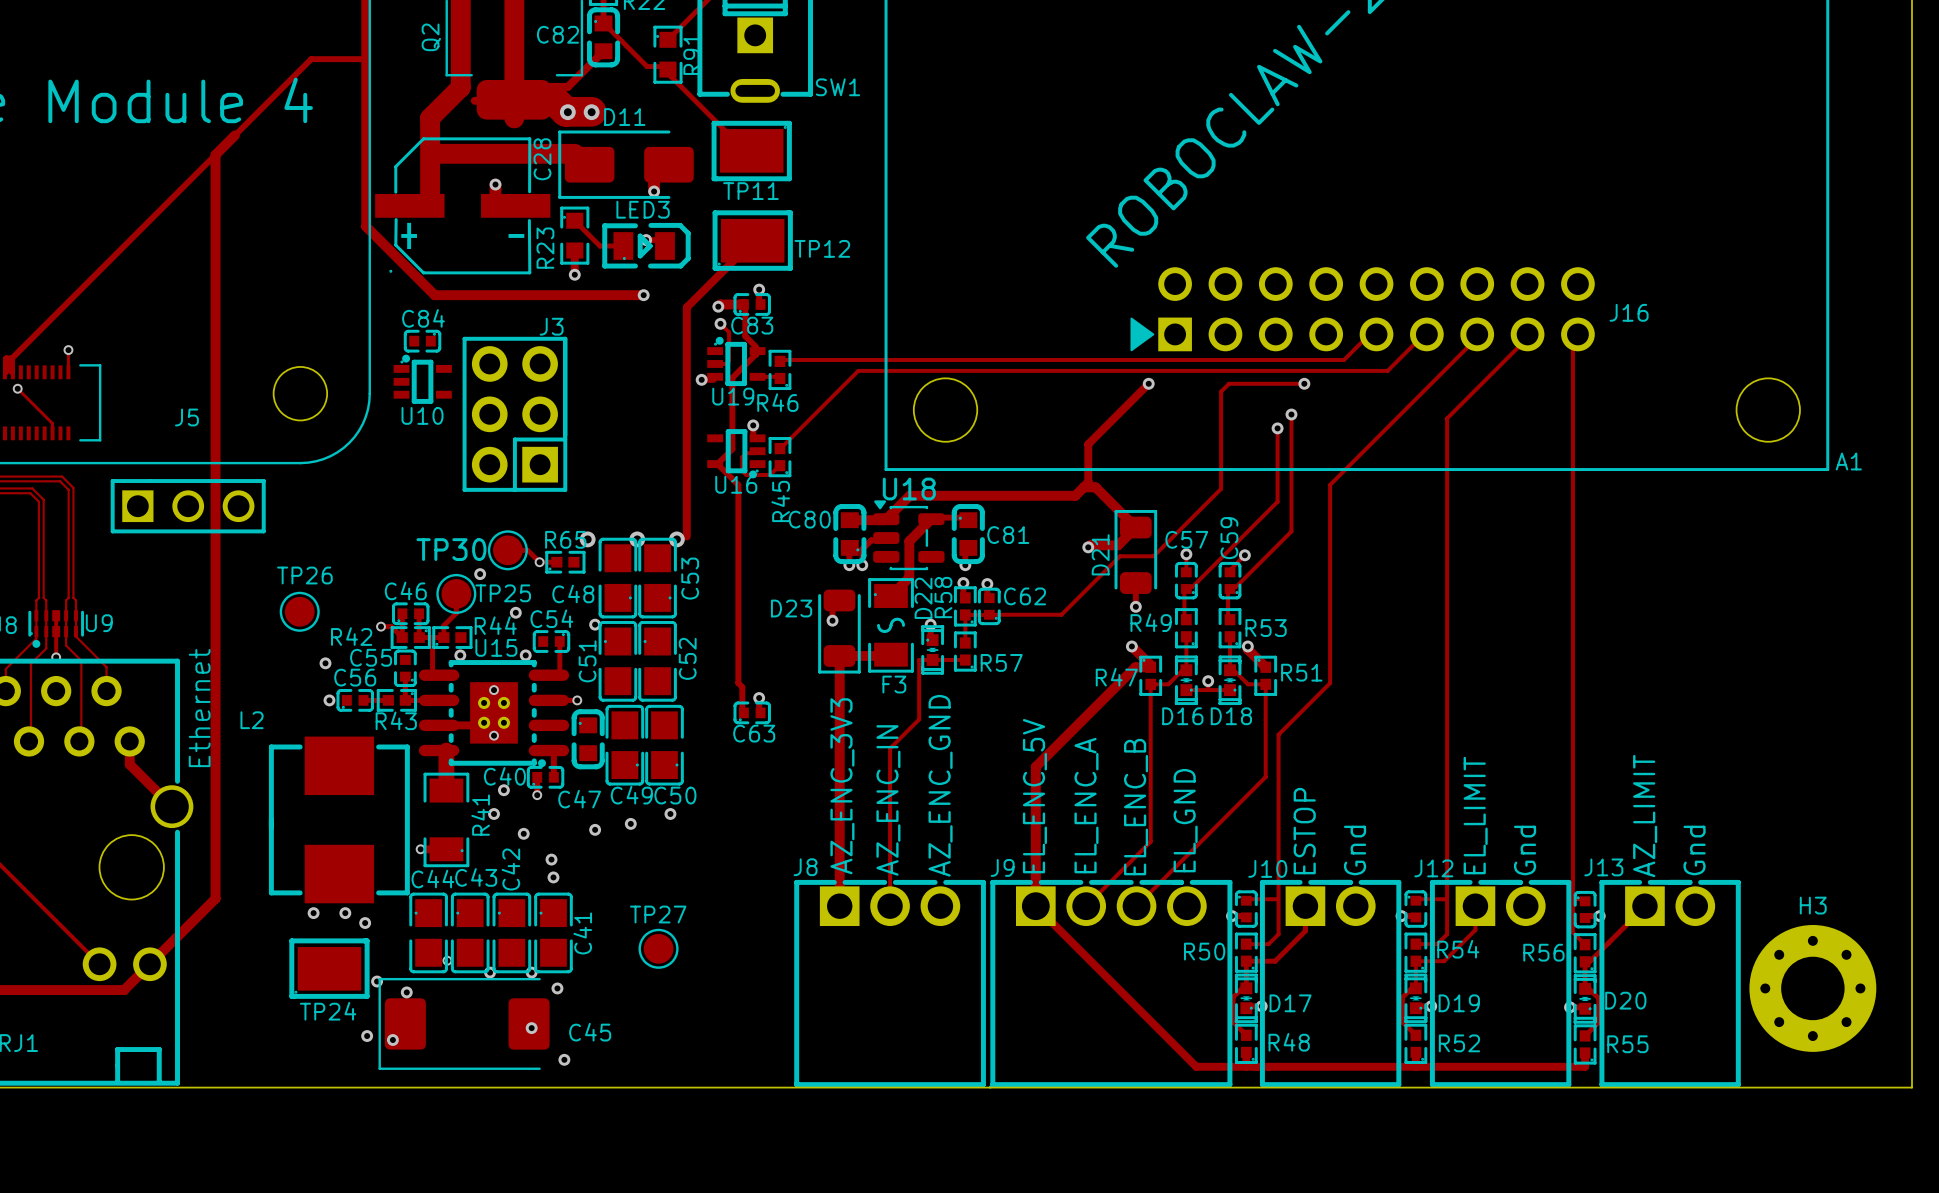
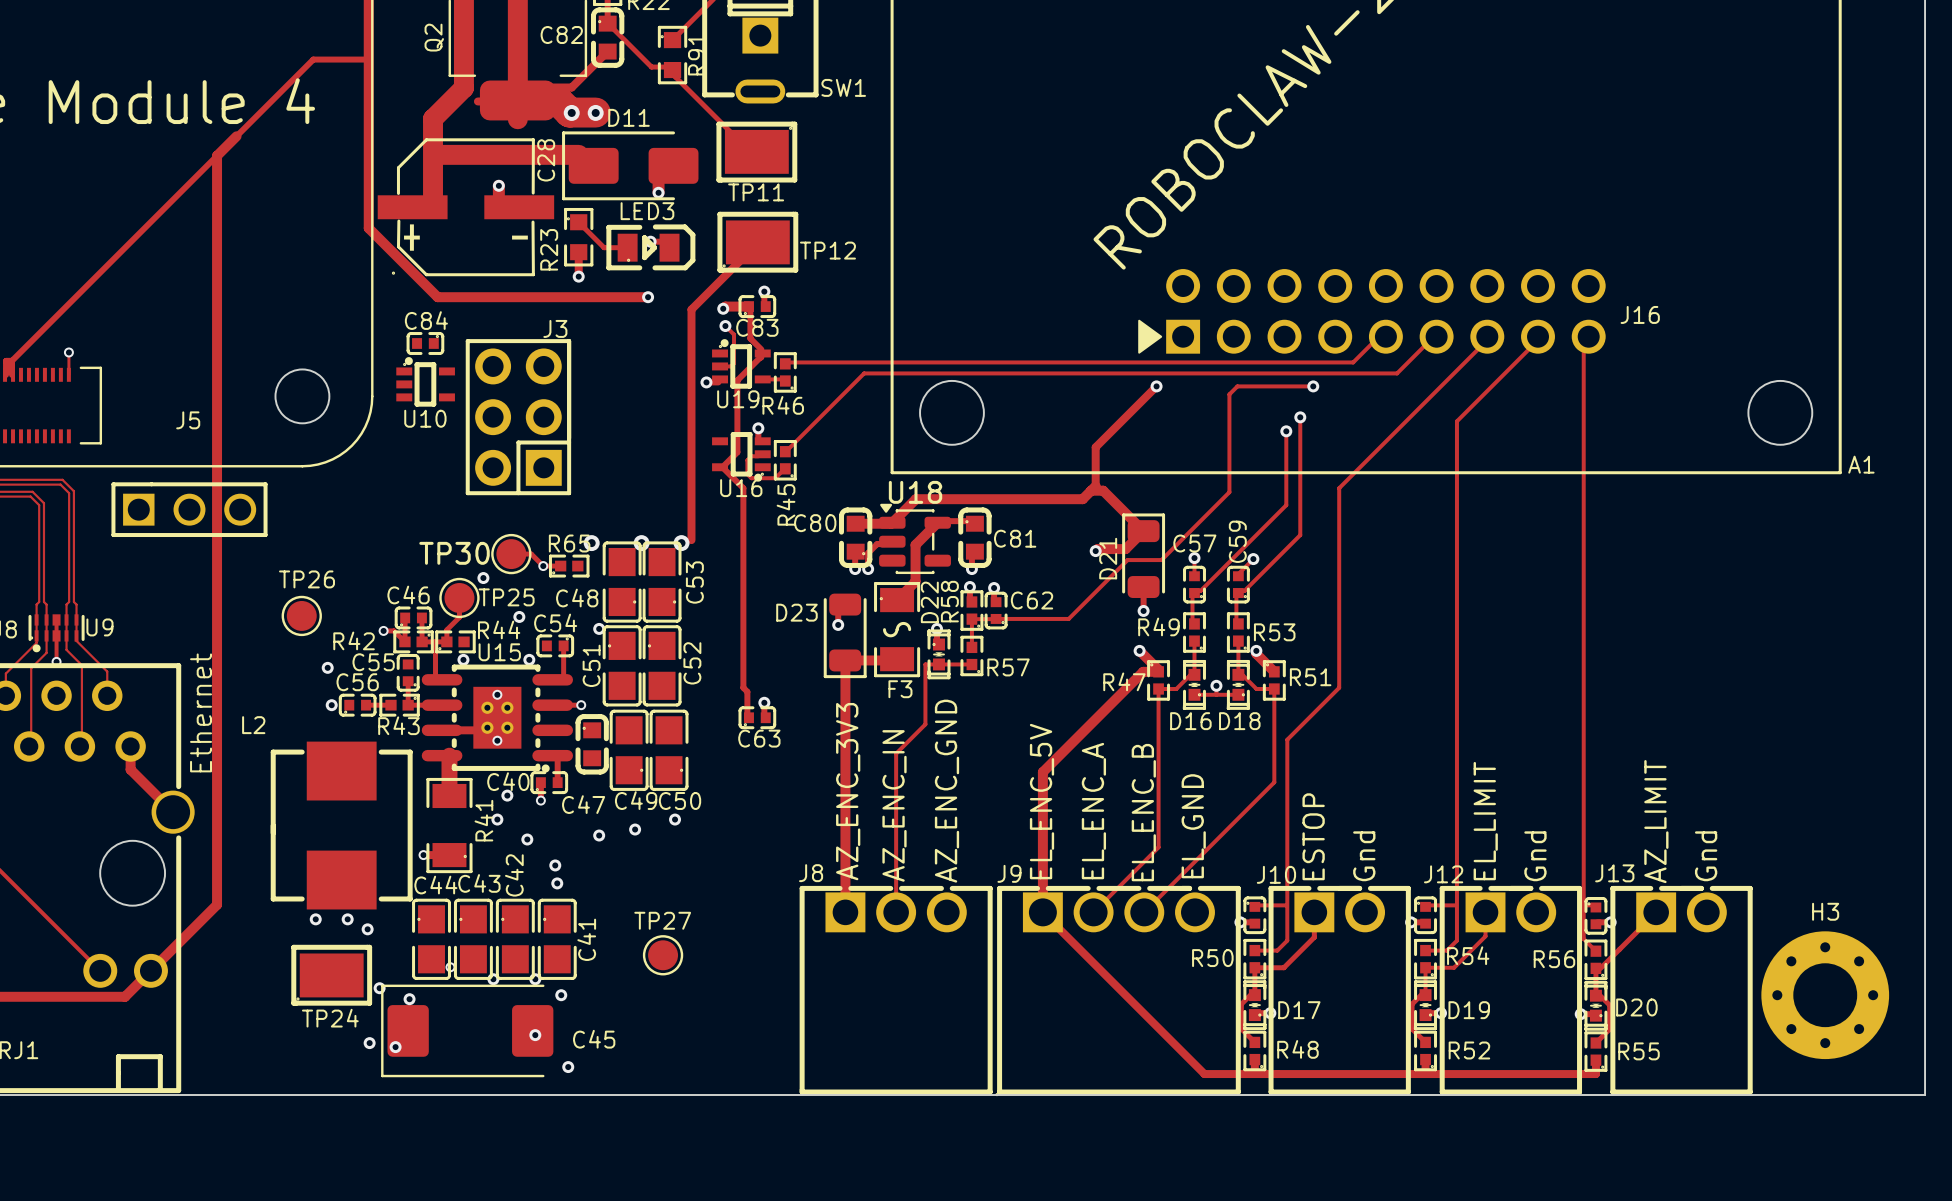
track: (17, 388) (52, 423) (52, 429) -> none
via: (17, 388) -> none

